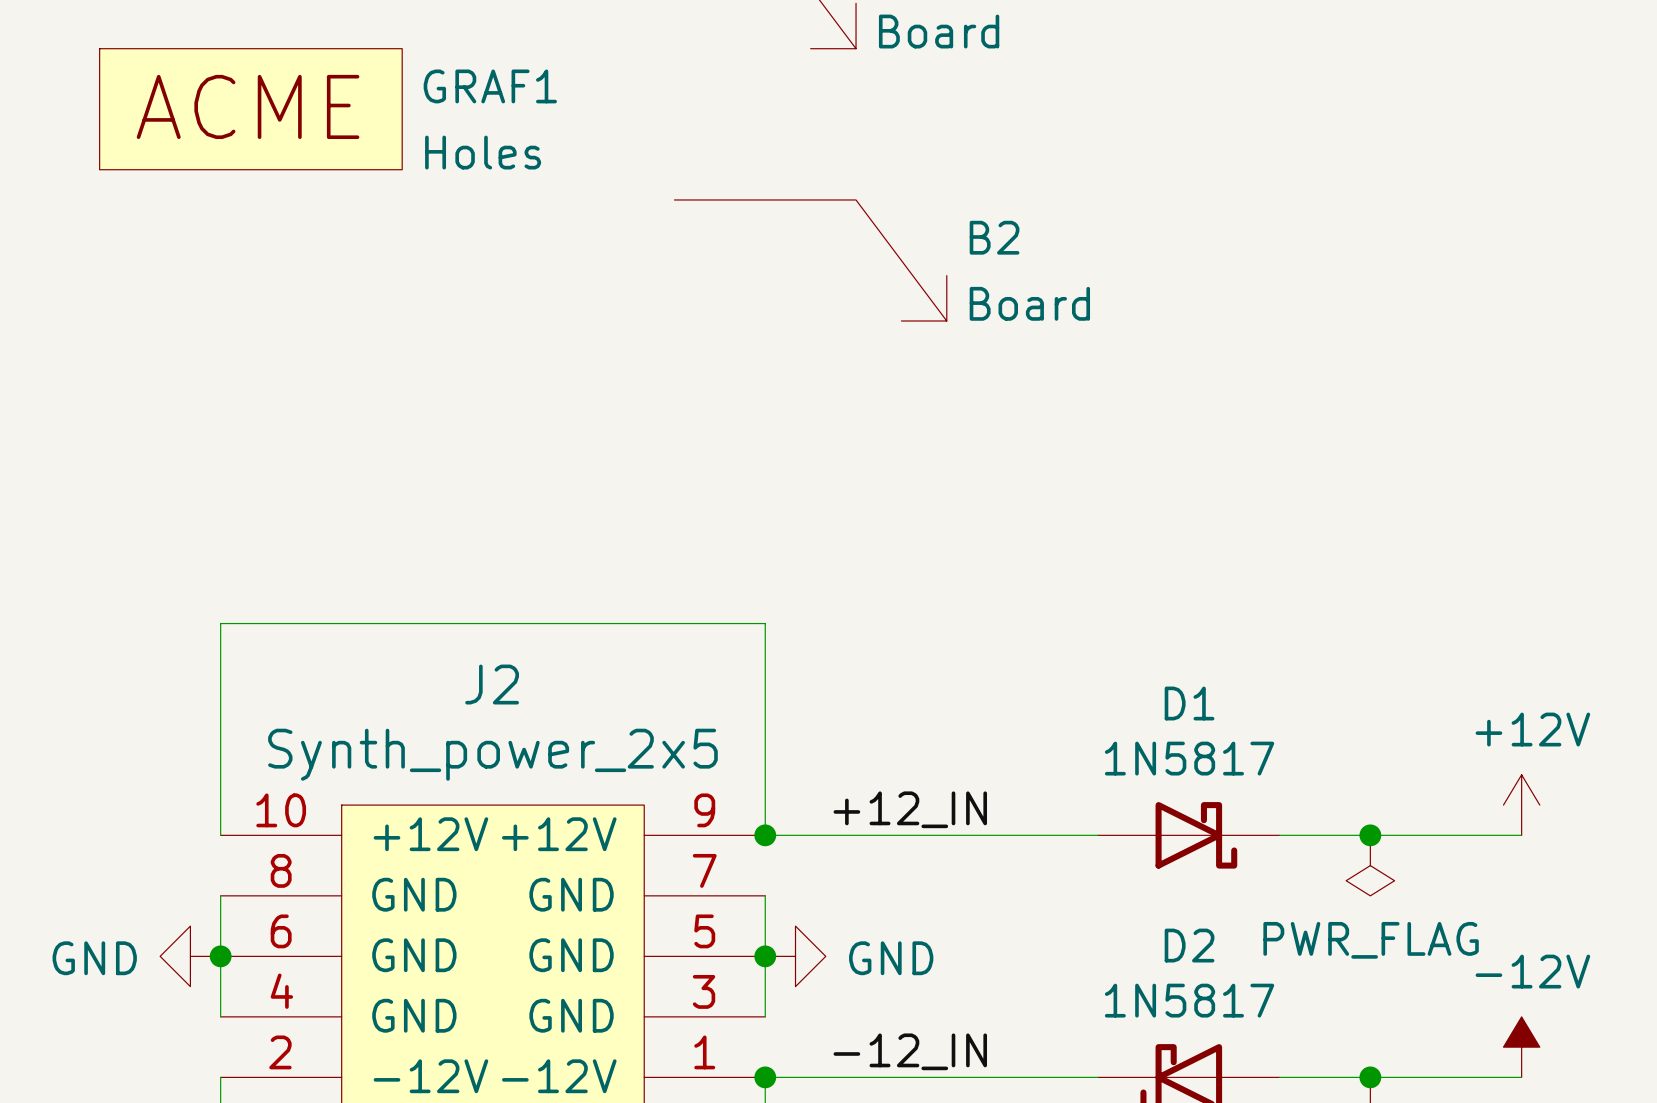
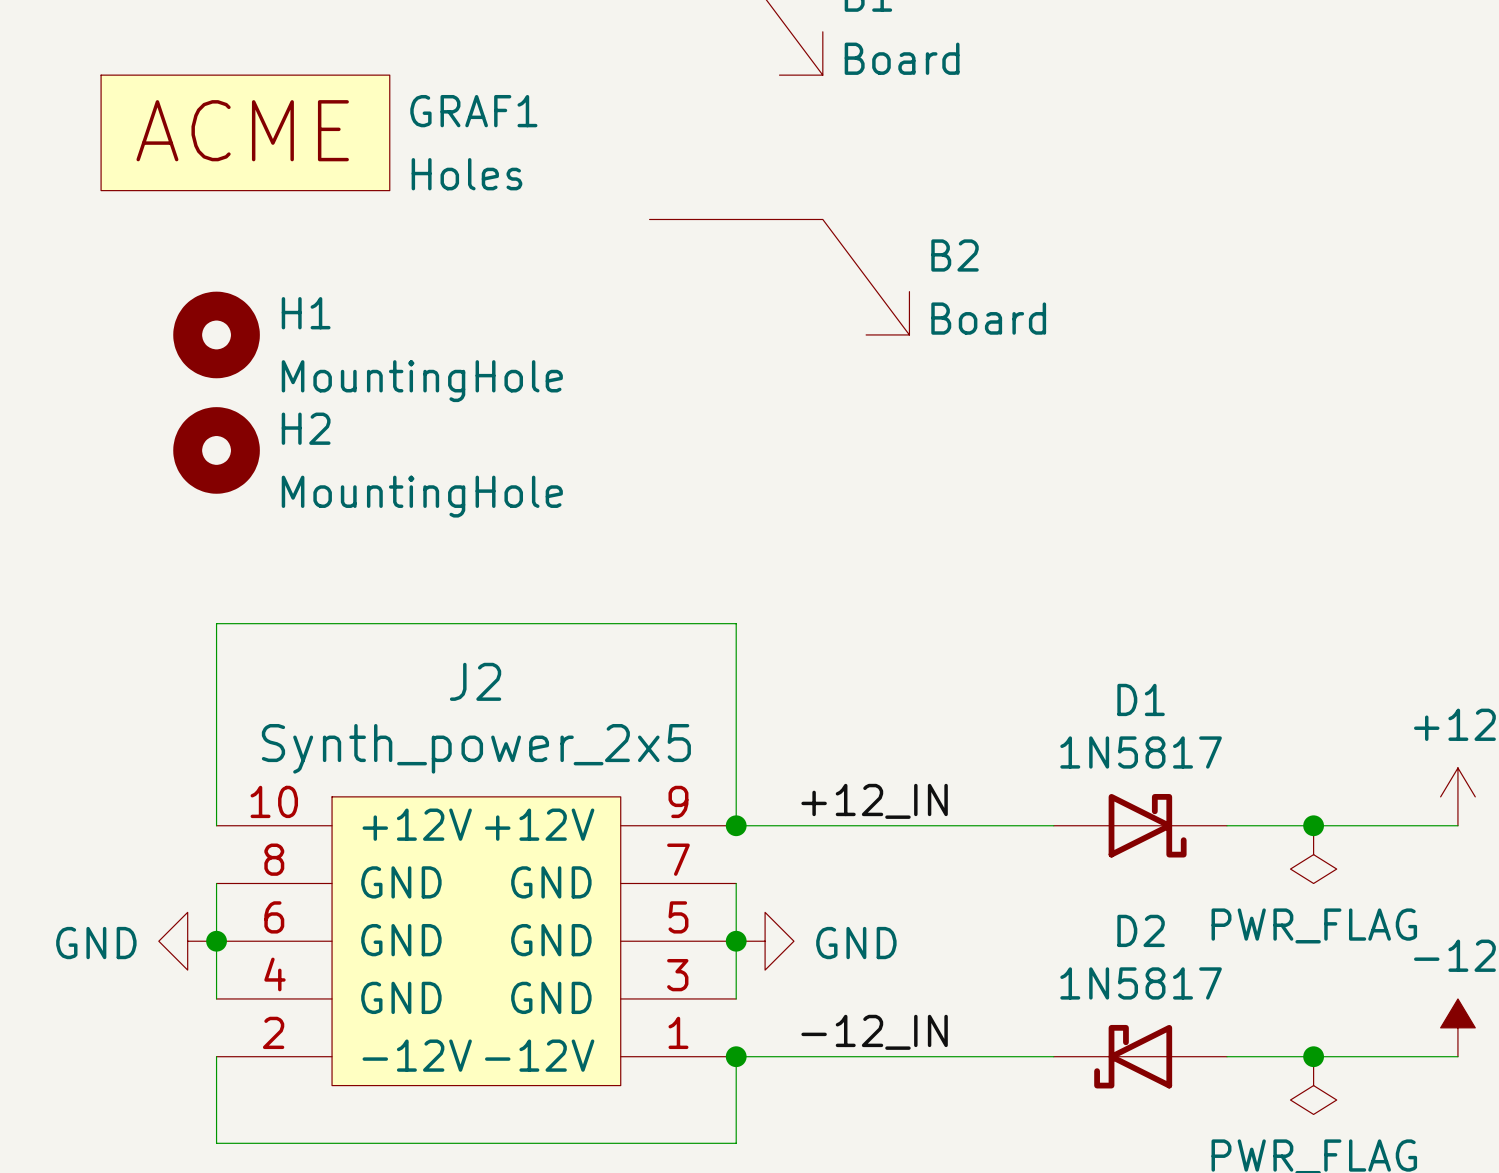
H1: none -> MountingHole (216, 334)
H2: none -> MountingHole (216, 450)

